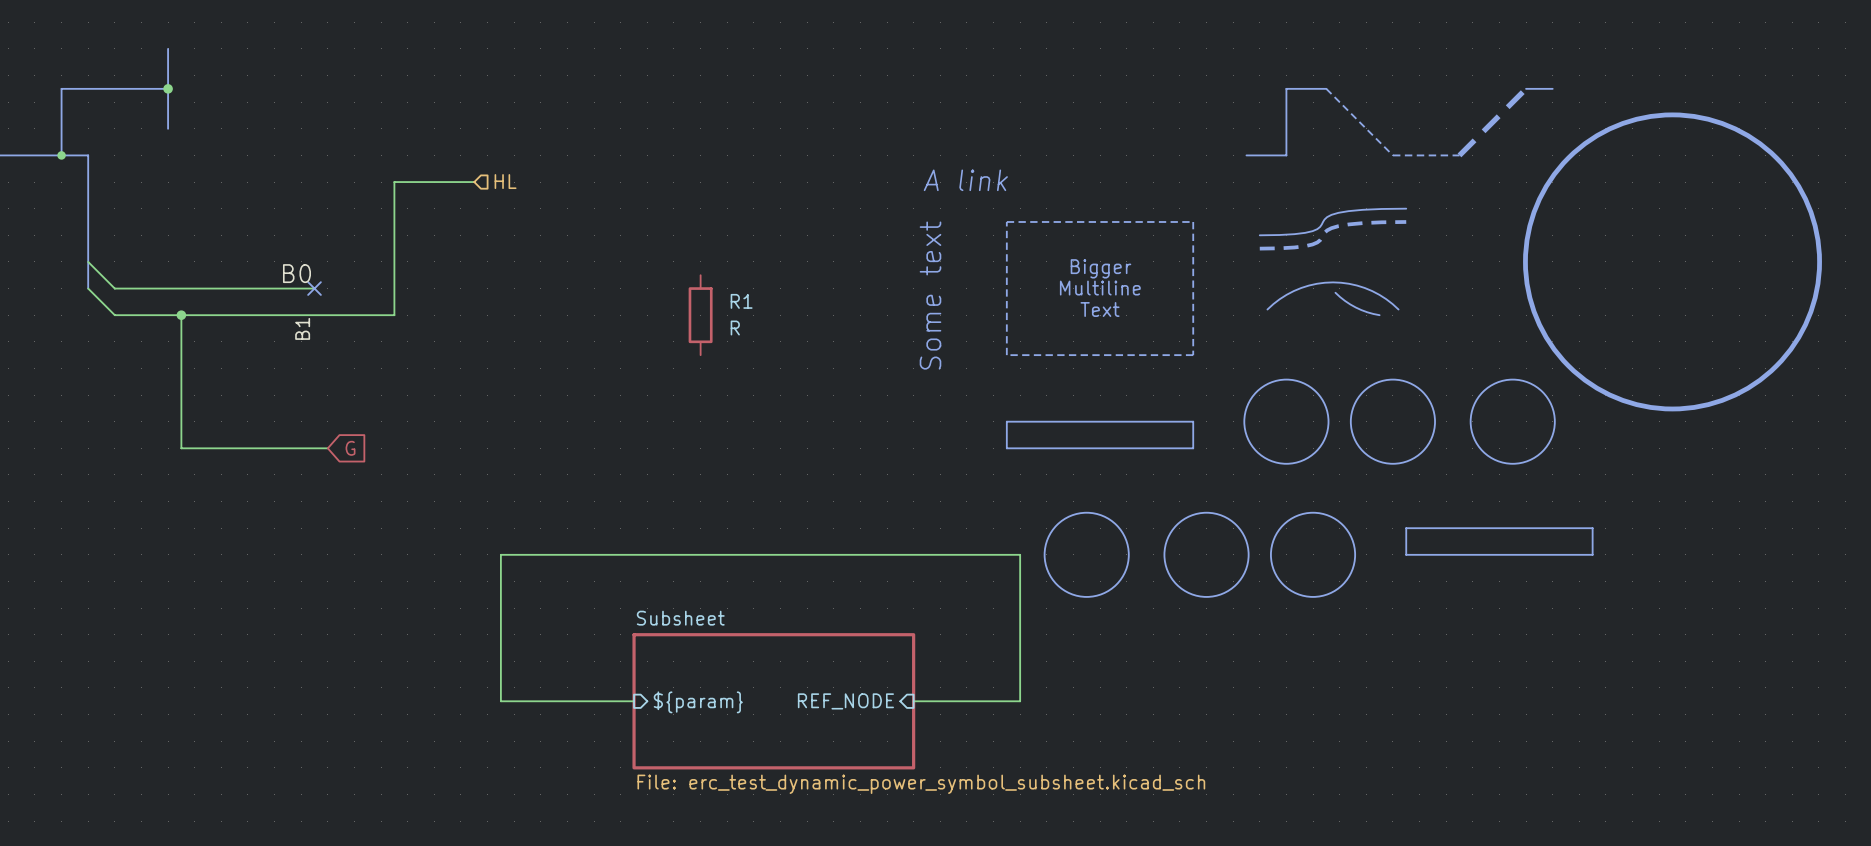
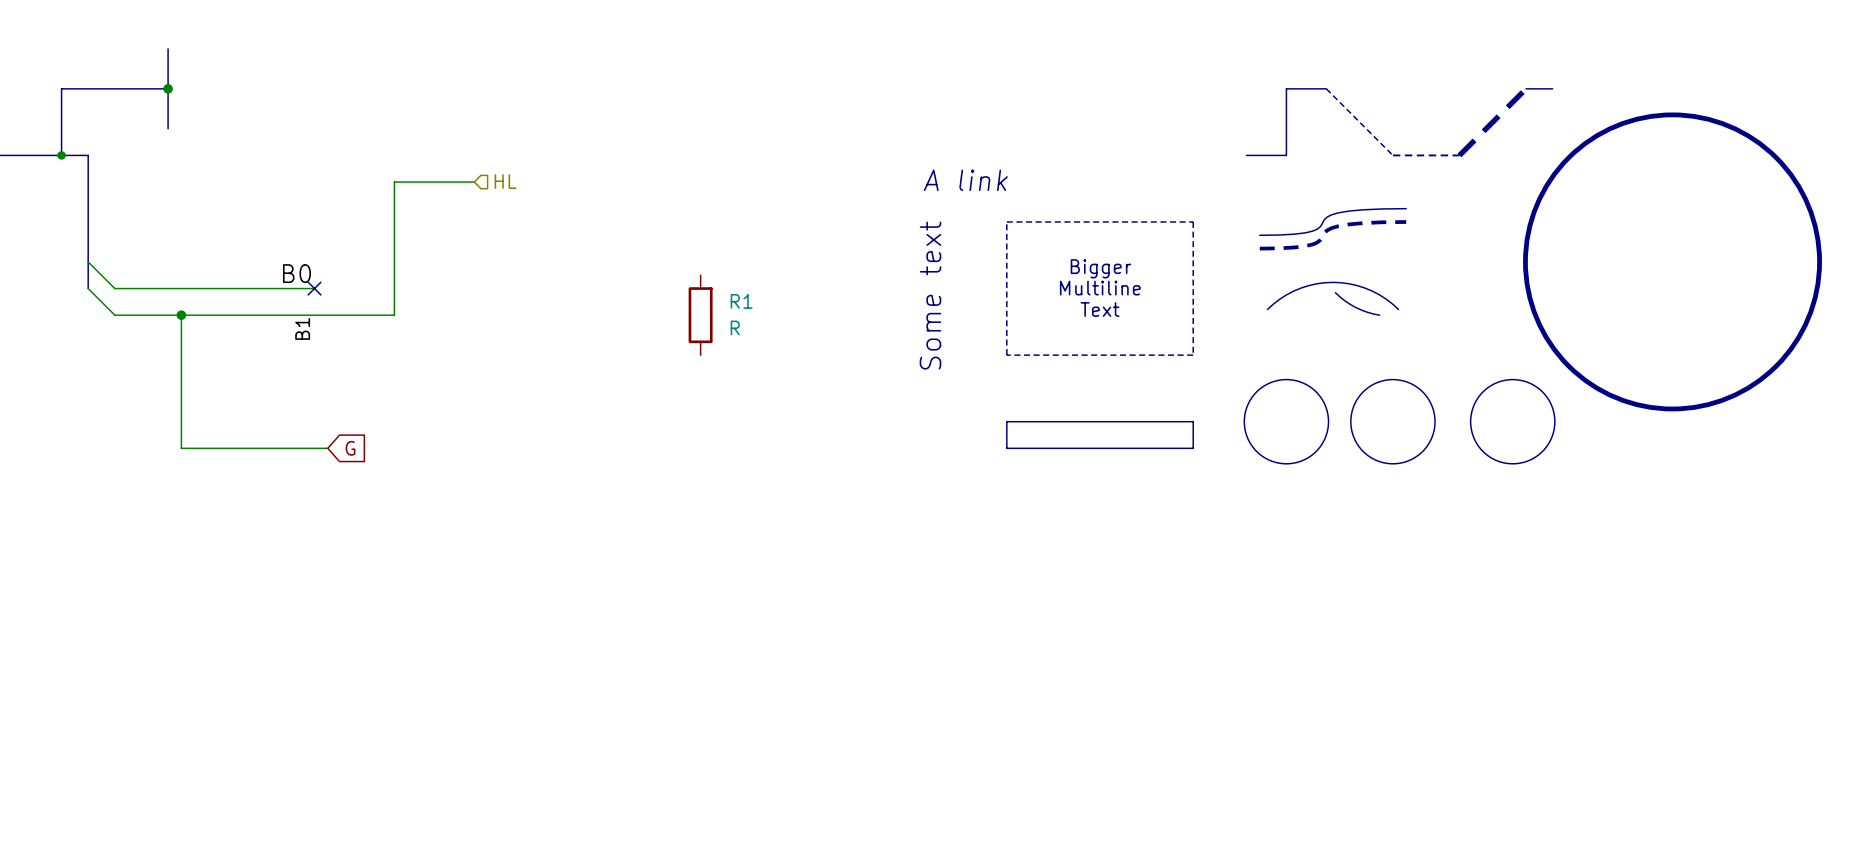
drawing: [1044, 512, 1129, 597] -> none
drawing: [1164, 512, 1249, 597] -> none
drawing: [1270, 512, 1356, 597] -> none
line: (1406, 528) (1406, 554) (1592, 554) (1592, 528) (1406, 528) -> none
wire: (634, 701) (500, 701) (500, 554) (1020, 554) (1020, 701) (913, 701) -> none
sheet Subsheet: File: erc_test_dynamic_power_symbol_subsheet.kicad_sch (773, 701) -> none
sheet pin: REF_NODE (845, 701) -> none
sheet pin: ${param} (698, 702) -> none

